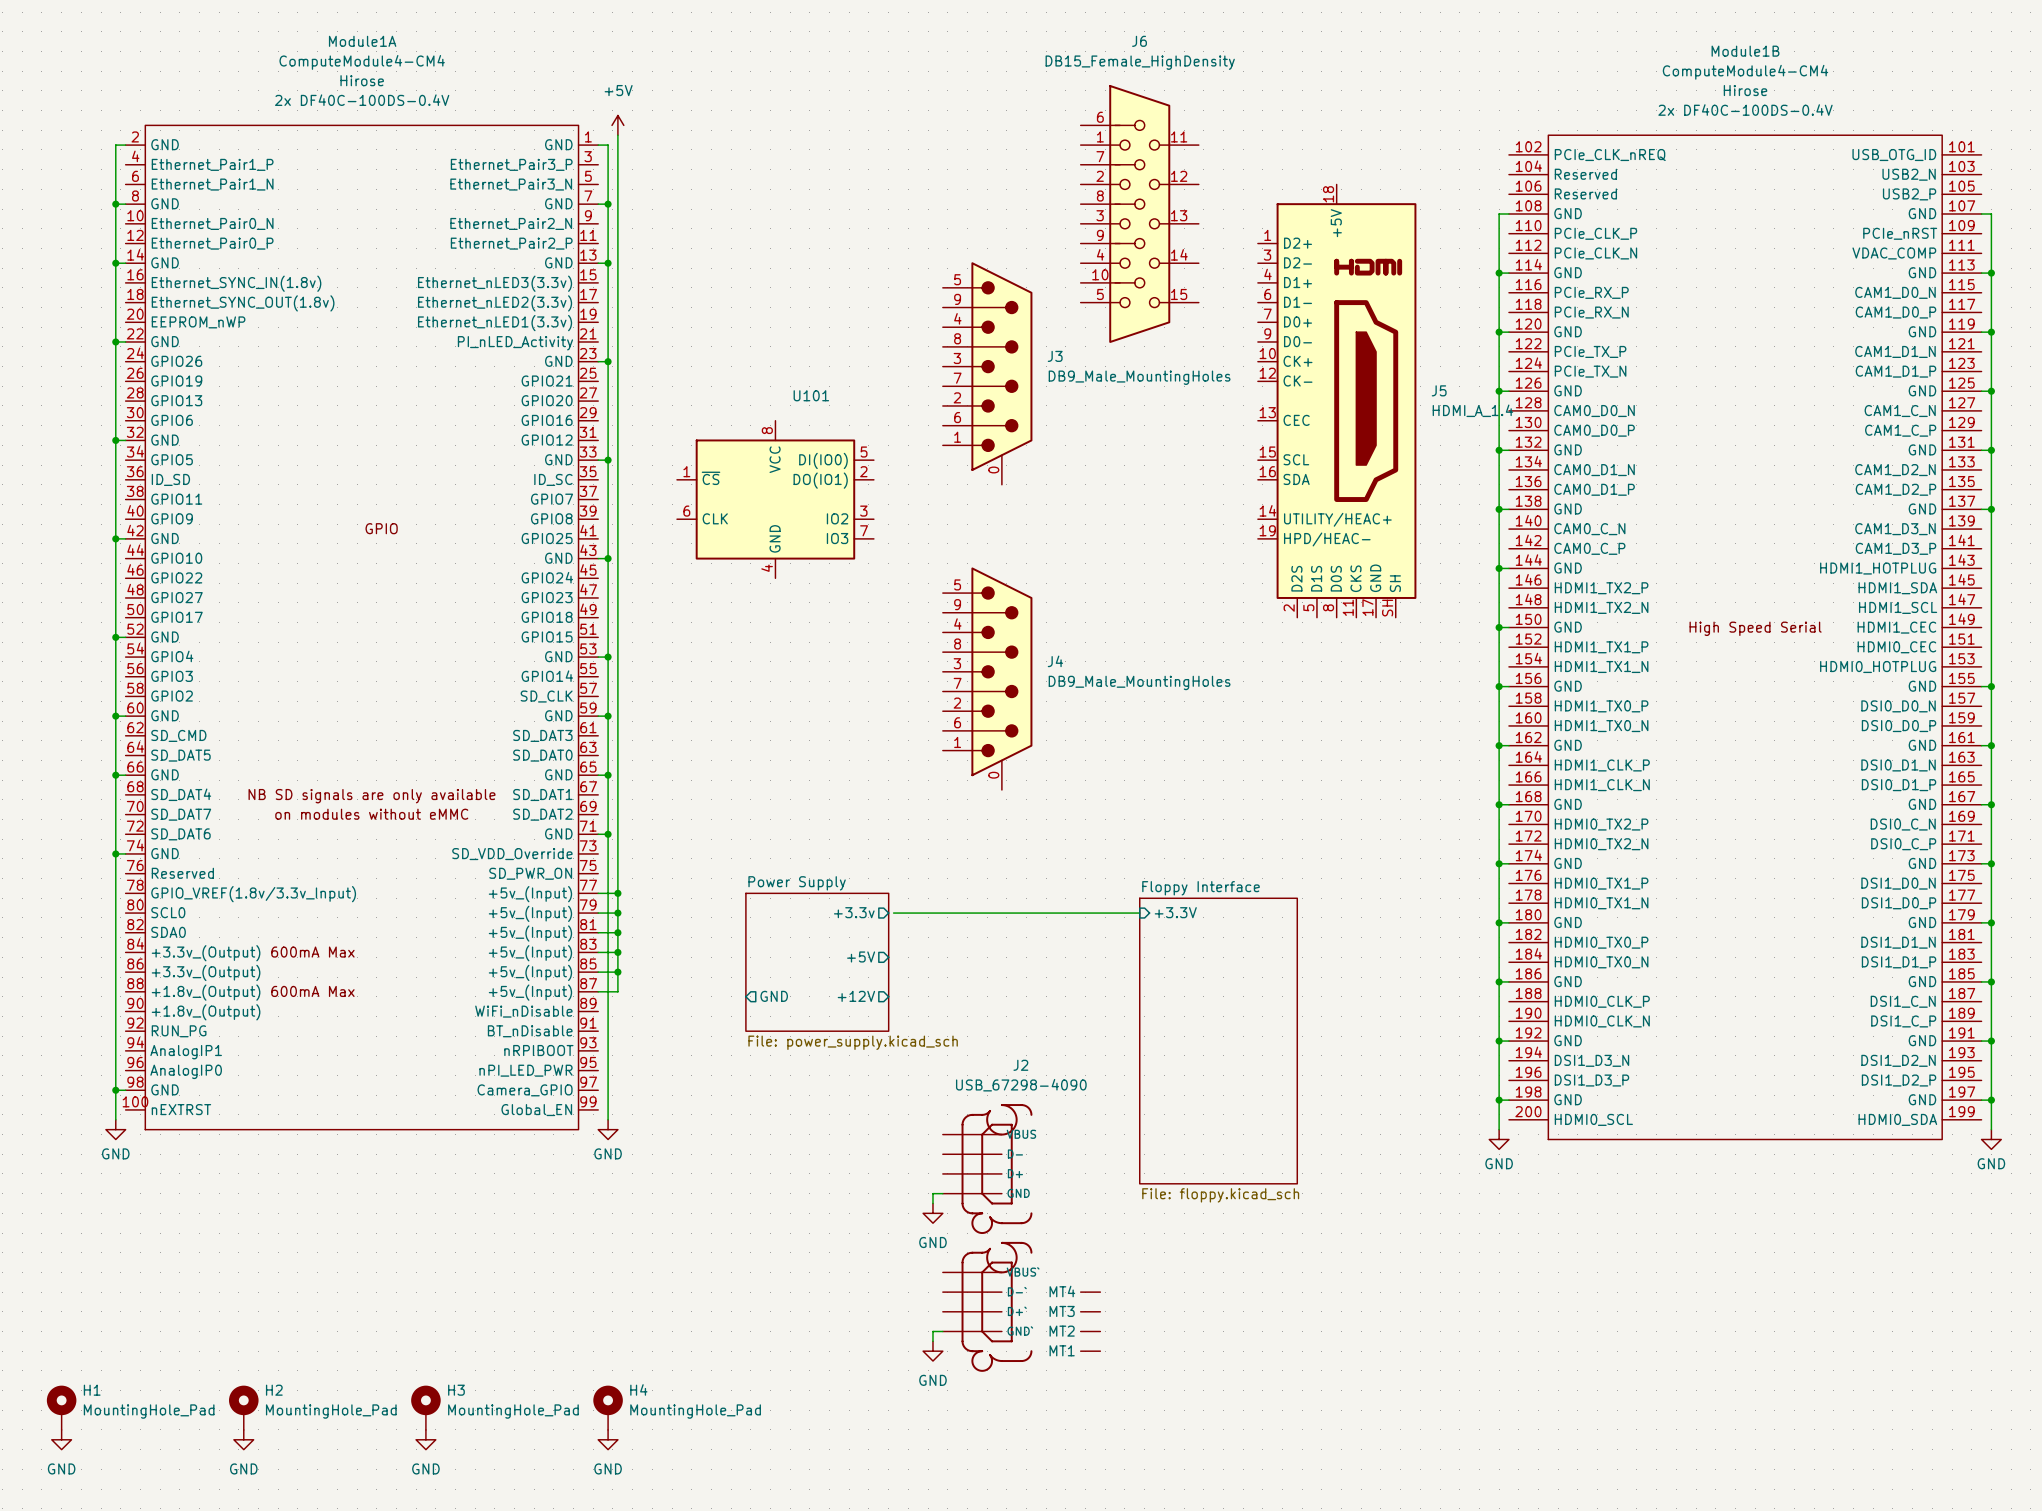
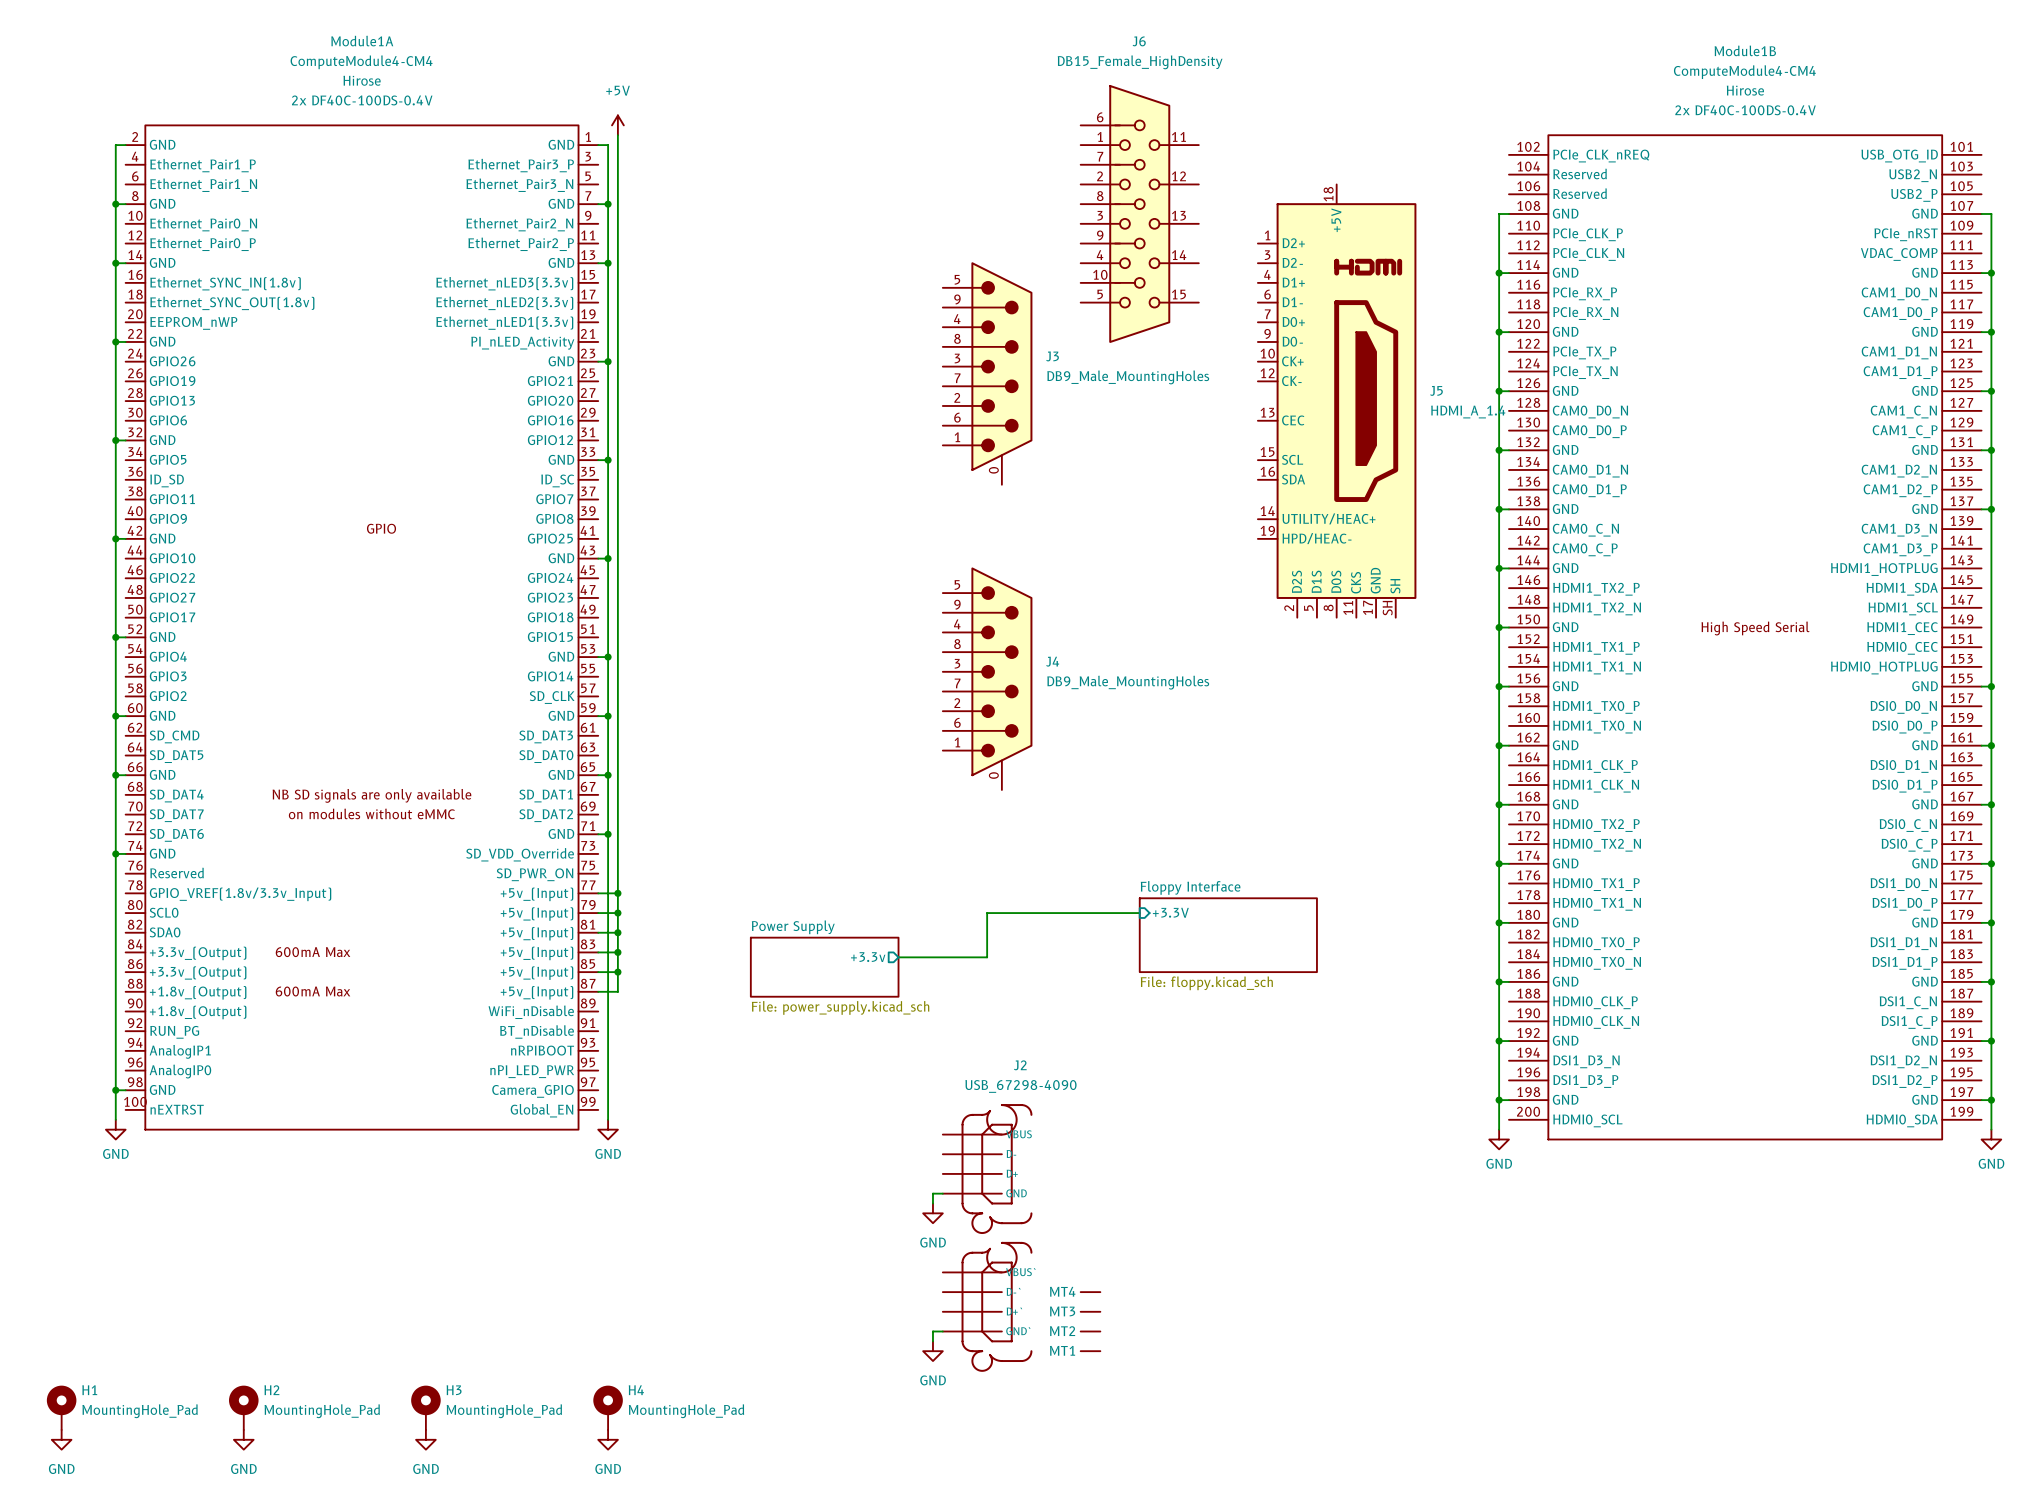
U101: (775, 499) -> none
sheet pin position: +3.3v (854, 912) -> +3.3v (868, 957)
wire: (893, 913) (987, 913) -> (898, 957) (987, 957) (987, 913)
sheet Floppy Interface: none -> File: floppy.kicad_sch (1228, 935)
sheet pin: +5V (861, 956) -> none
sheet Power Supply: File: power_supply.kicad_sch (817, 962) -> none
sheet Power Supply: none -> File: power_supply.kicad_sch (824, 967)
sheet pin: GND (774, 996) -> none
sheet pin: +12V (856, 996) -> none
sheet Floppy Interface: File: floppy.kicad_sch (1218, 1041) -> none

